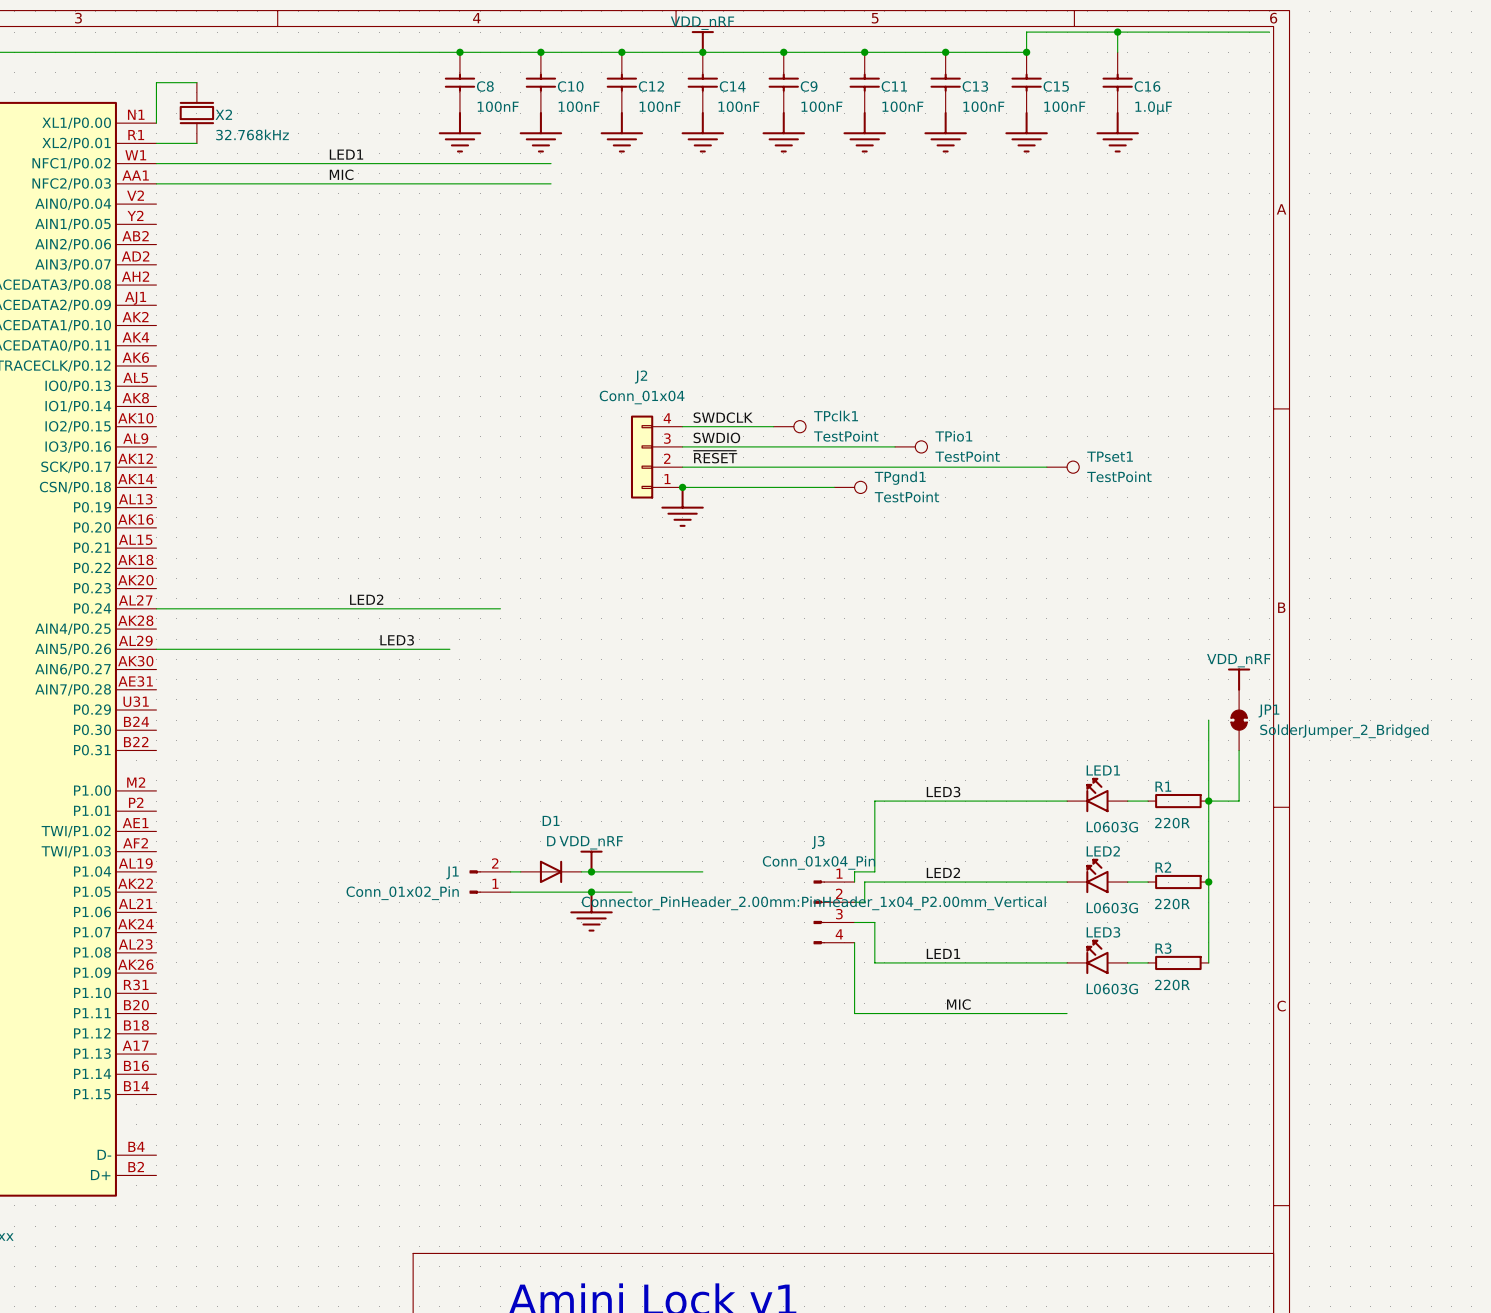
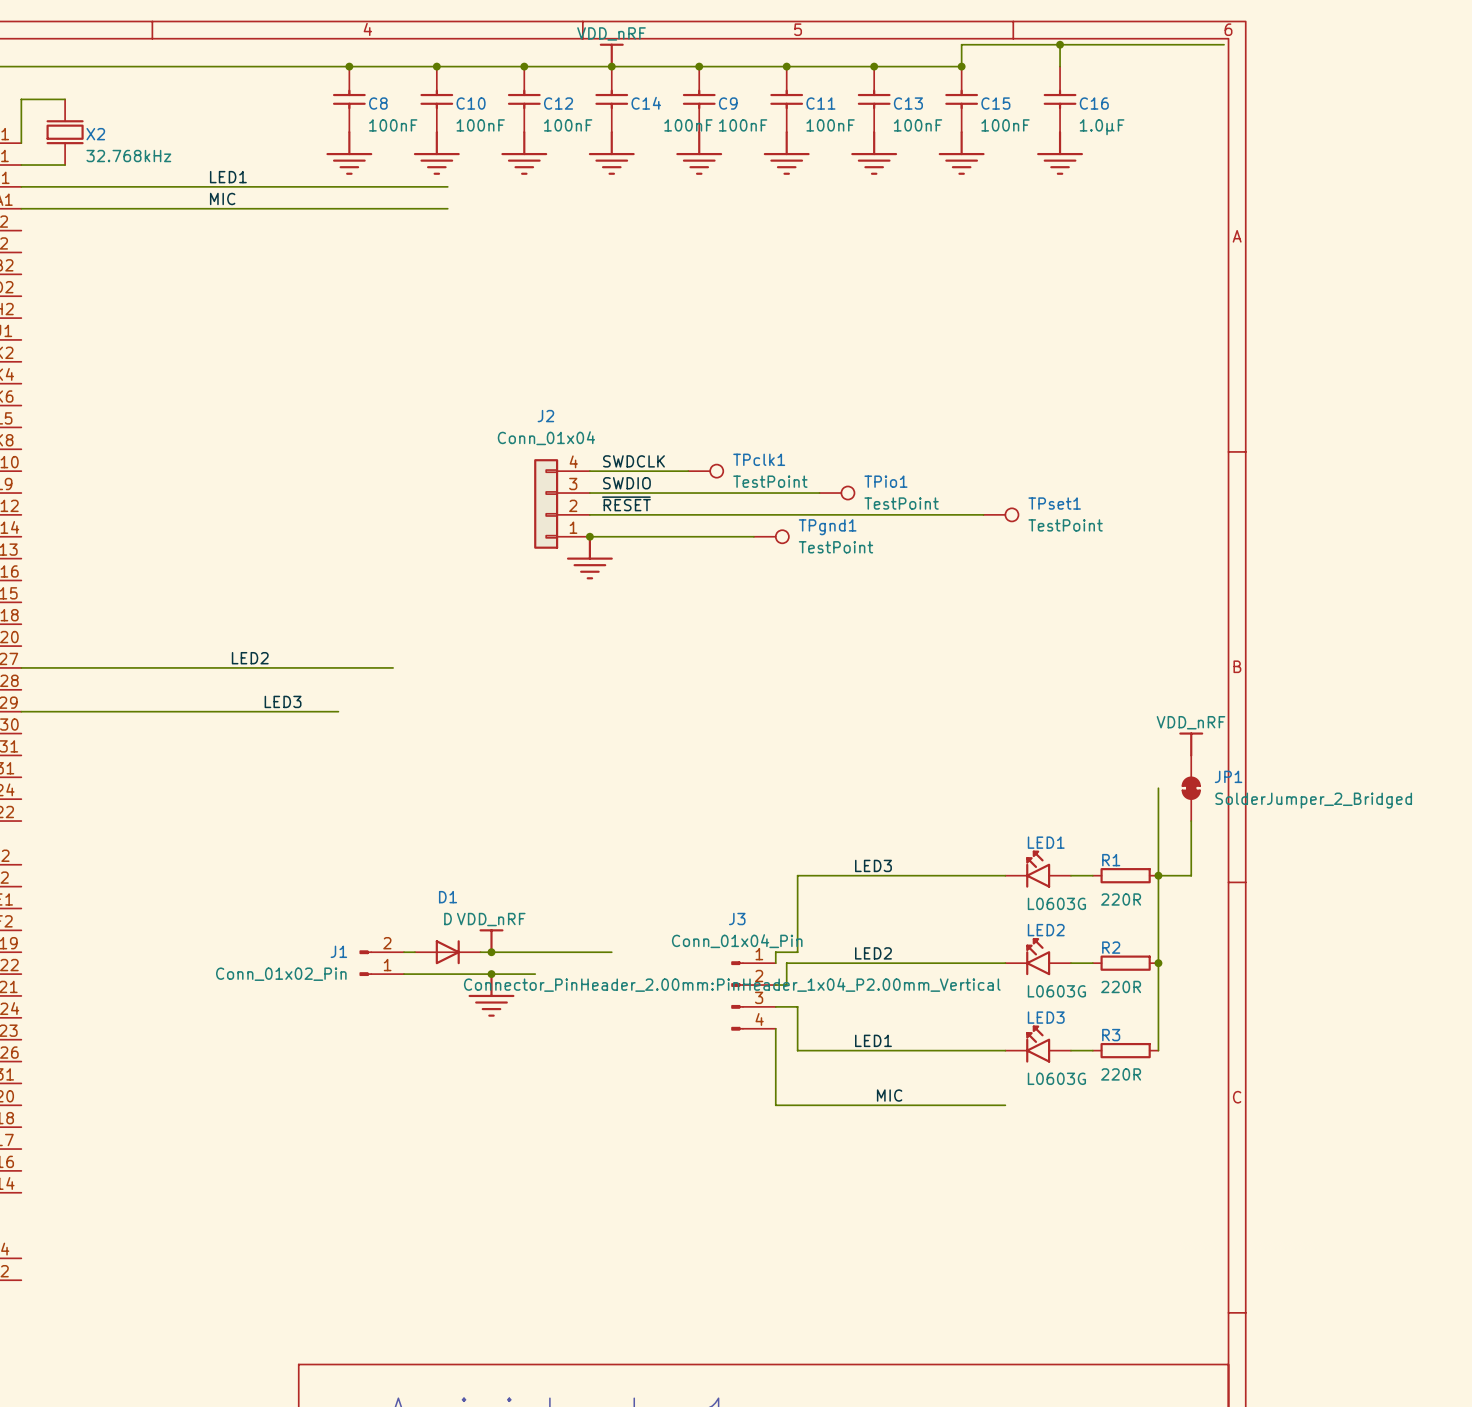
C14 value position: 100nF (738, 106) -> 100nF (688, 125)

